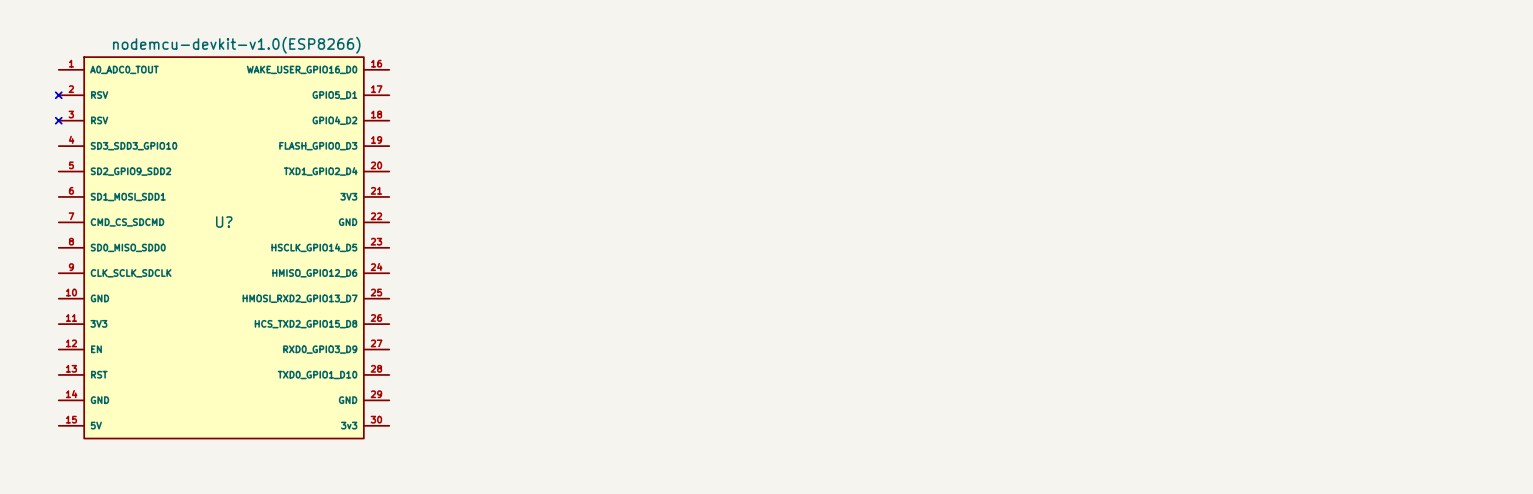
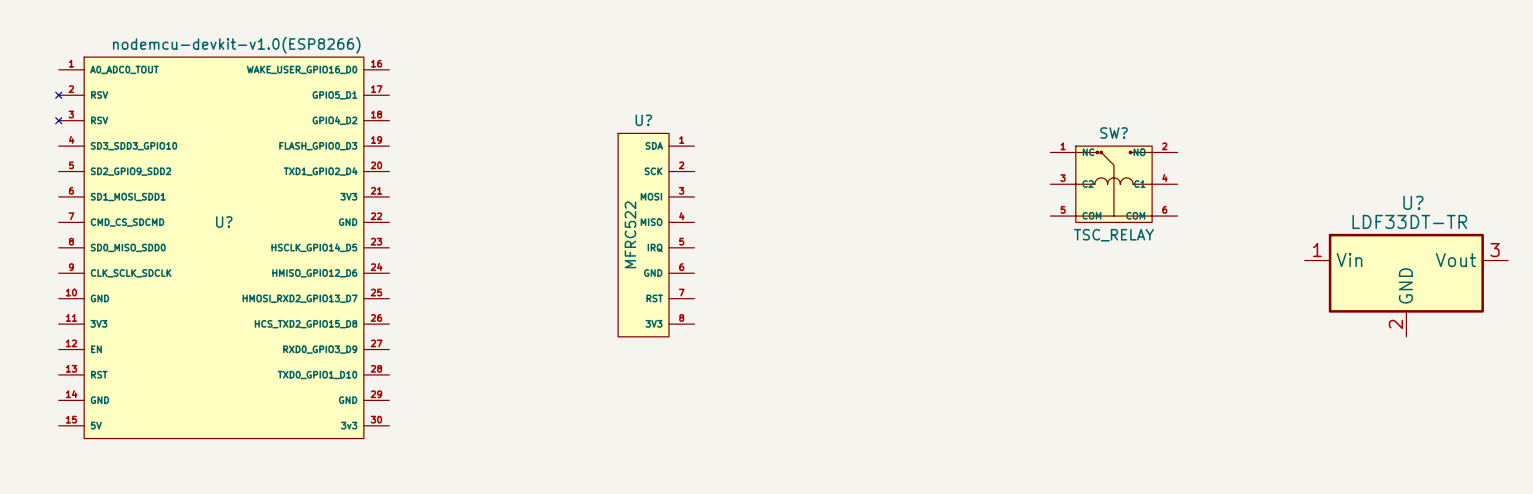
SW?: none -> TSC_RELAY (1113, 184)
U?: none -> MFRC522 (656, 235)
U?: none -> LDF33DT-TR (1406, 285)

